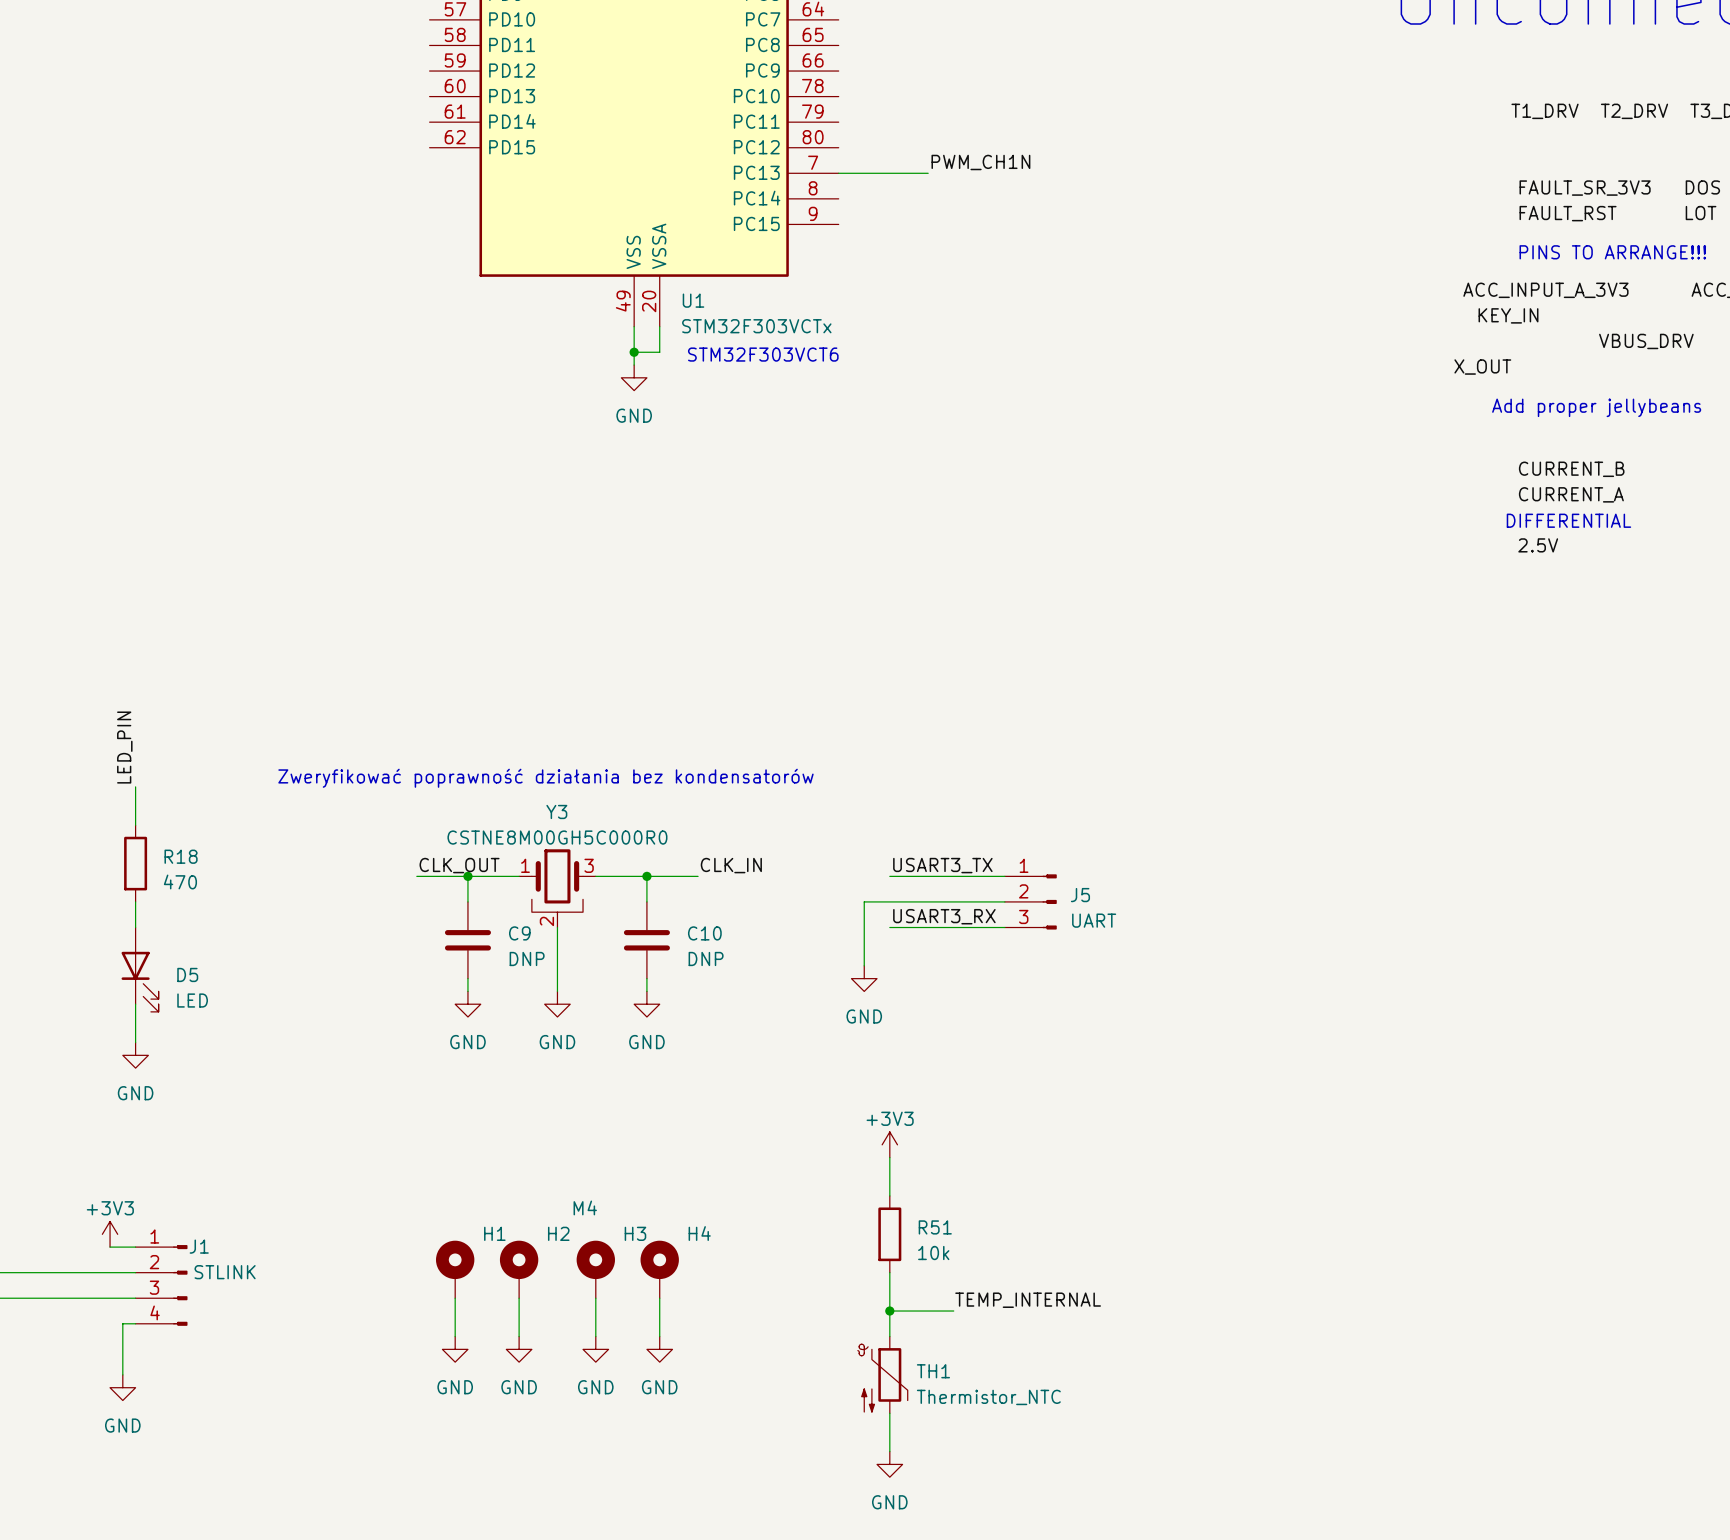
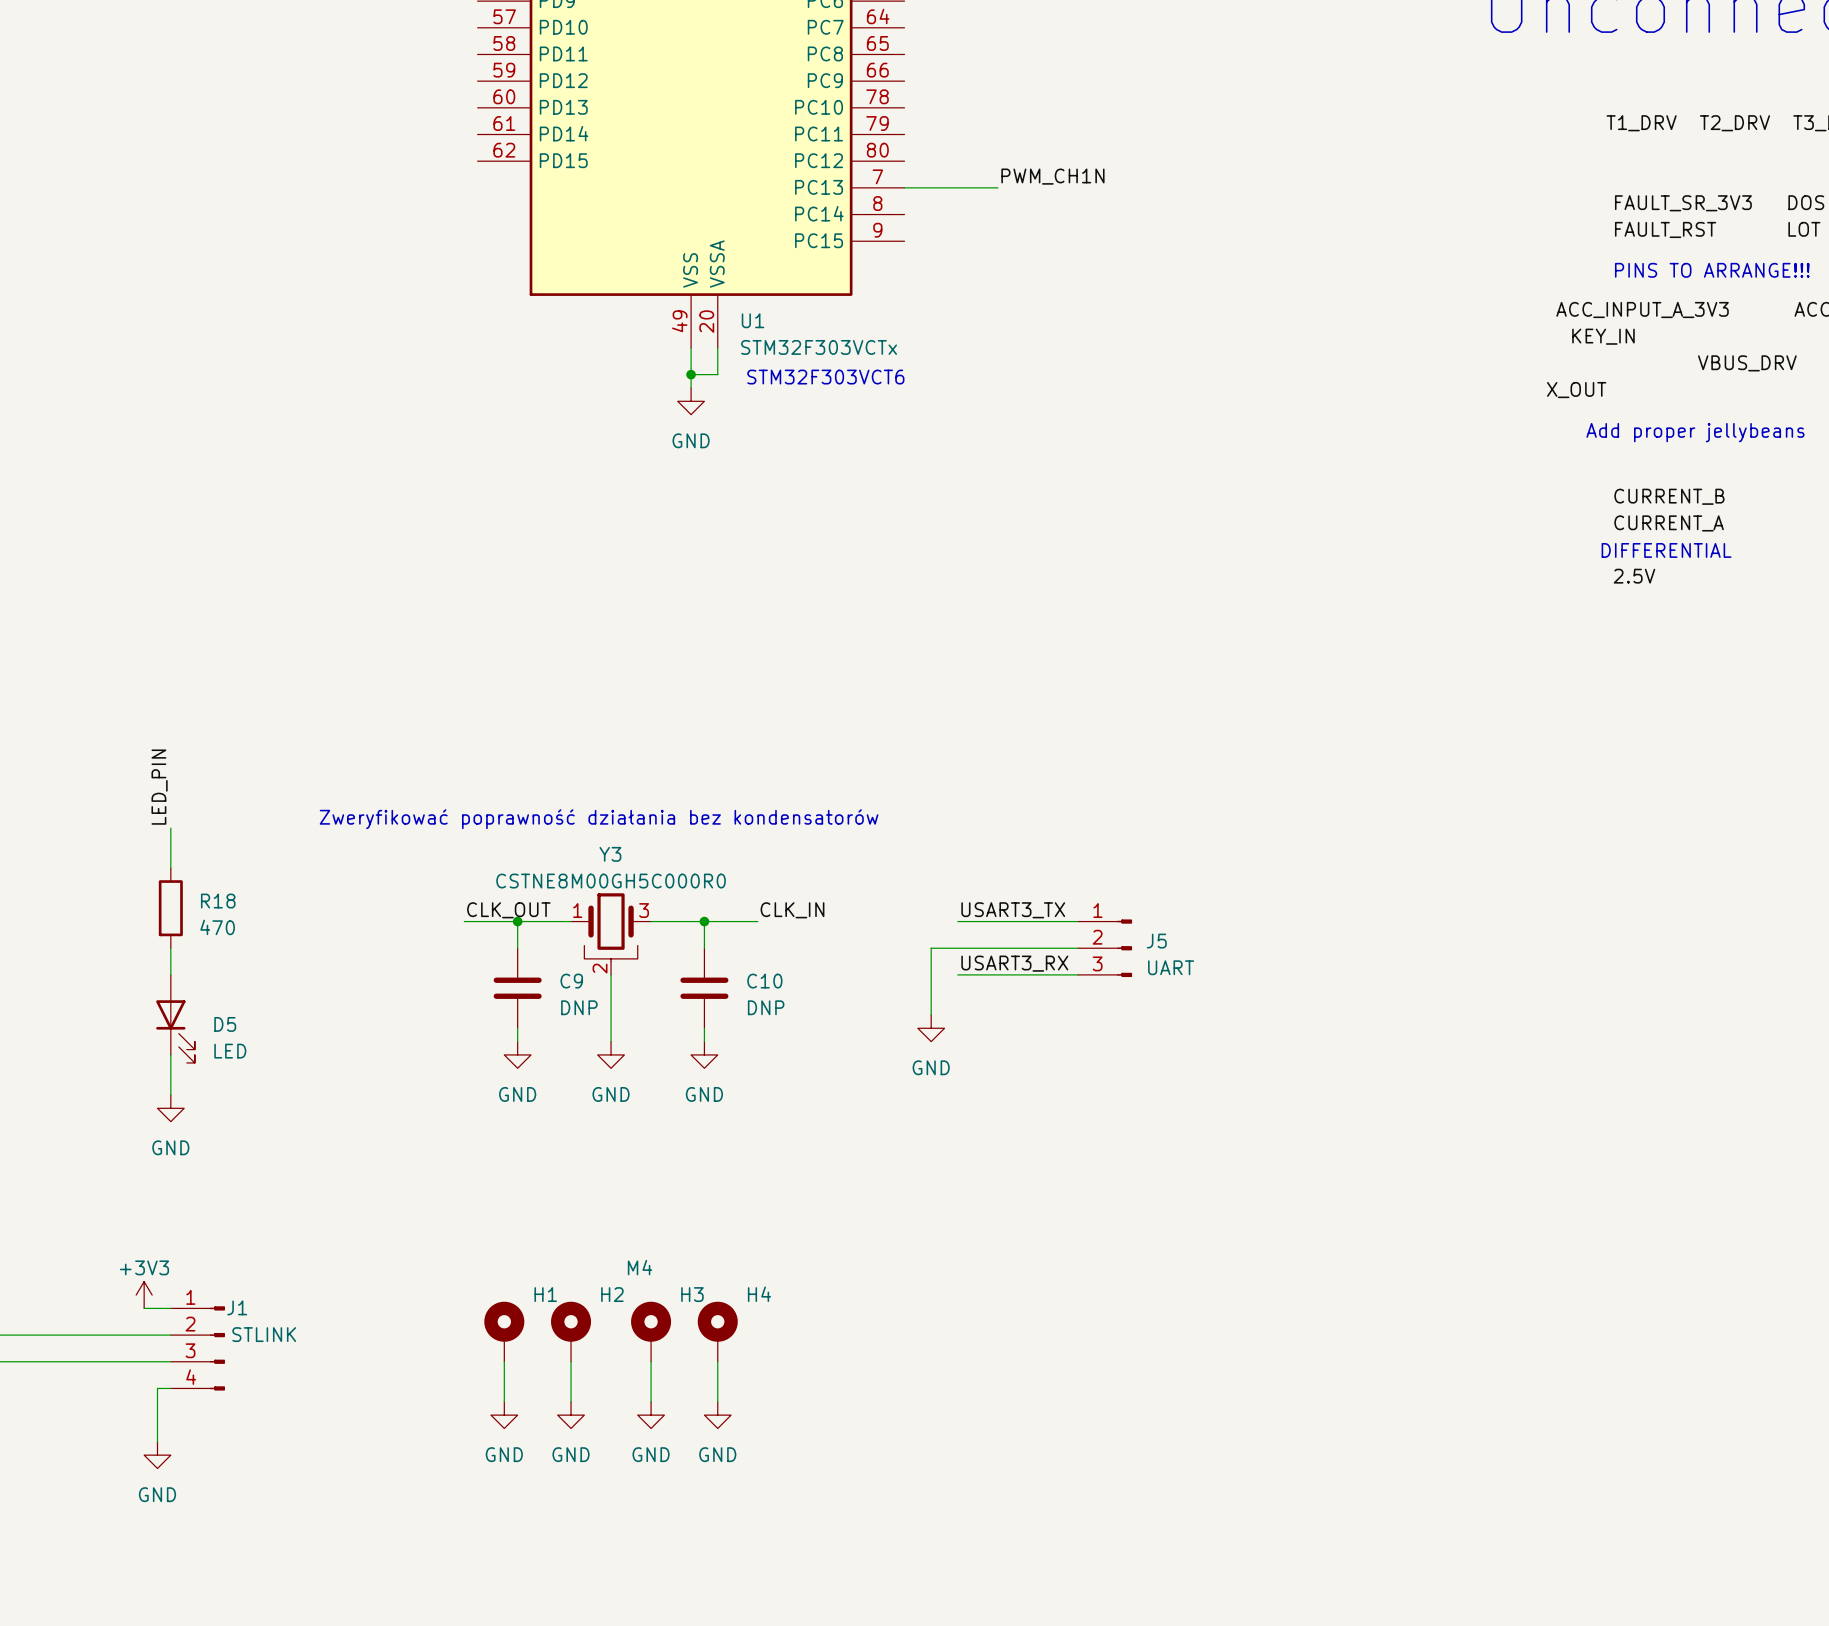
power symbol: +3V3 (889, 1144) -> none
wire: (889, 1157) (889, 1195) -> none
R51: 10k (889, 1234) -> none
wire: (889, 1272) (889, 1336) -> none
label: TEMP_INTERNAL (1028, 1300) -> none
wire: (889, 1311) (953, 1311) -> none
junction: (889, 1311) -> none
TH1: Thermistor_NTC (882, 1374) -> none
wire: (889, 1413) (889, 1451) -> none
power symbol: GND (889, 1464) -> none

